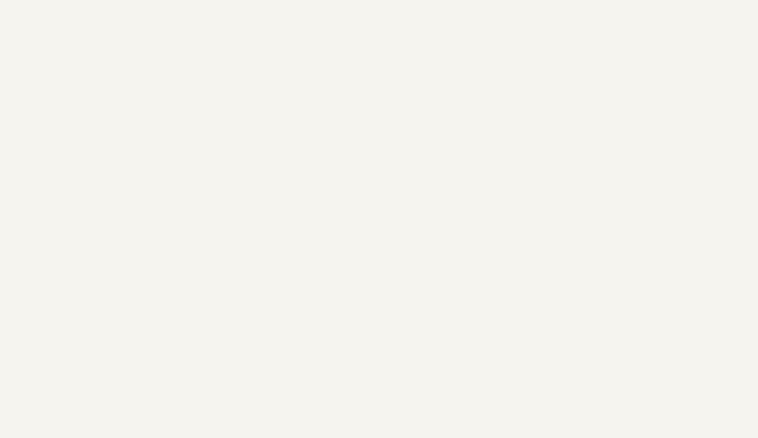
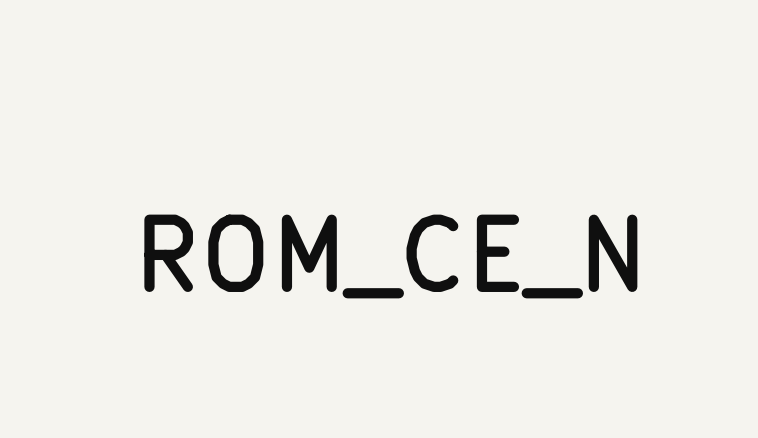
label: none -> ROM_CE_N (390, 256)

